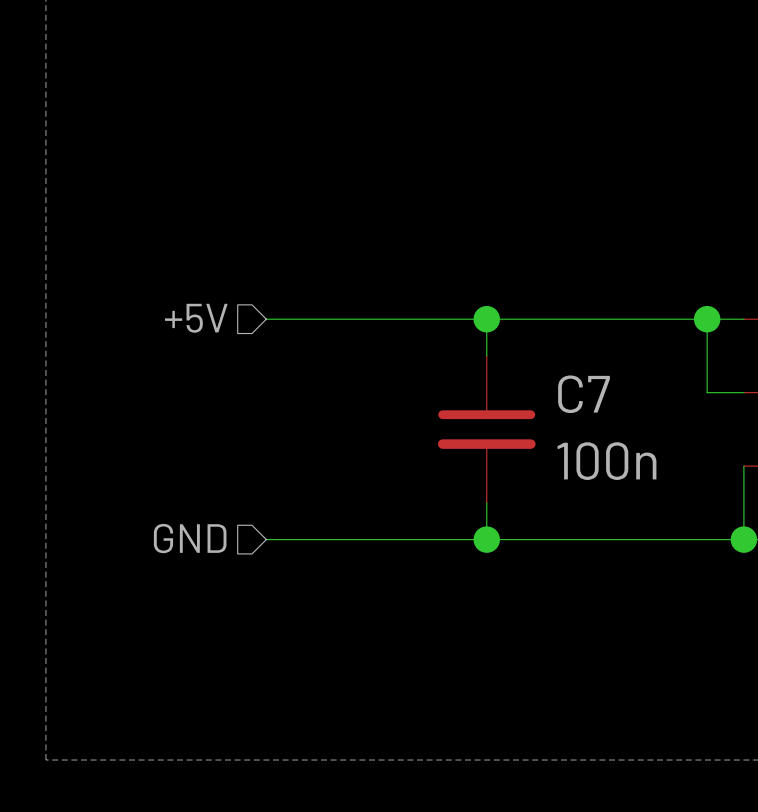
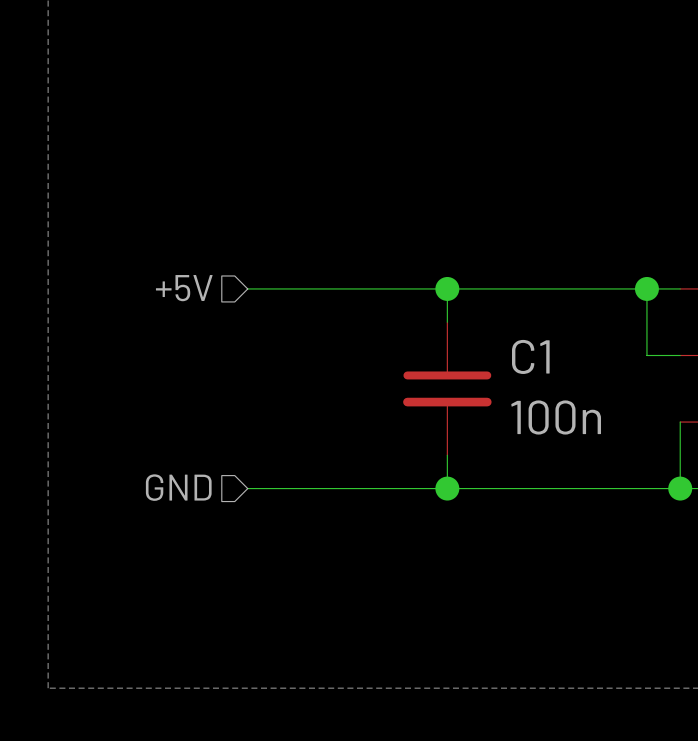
C7: 100n (486, 429) -> none
C1: none -> 100n (447, 388)

